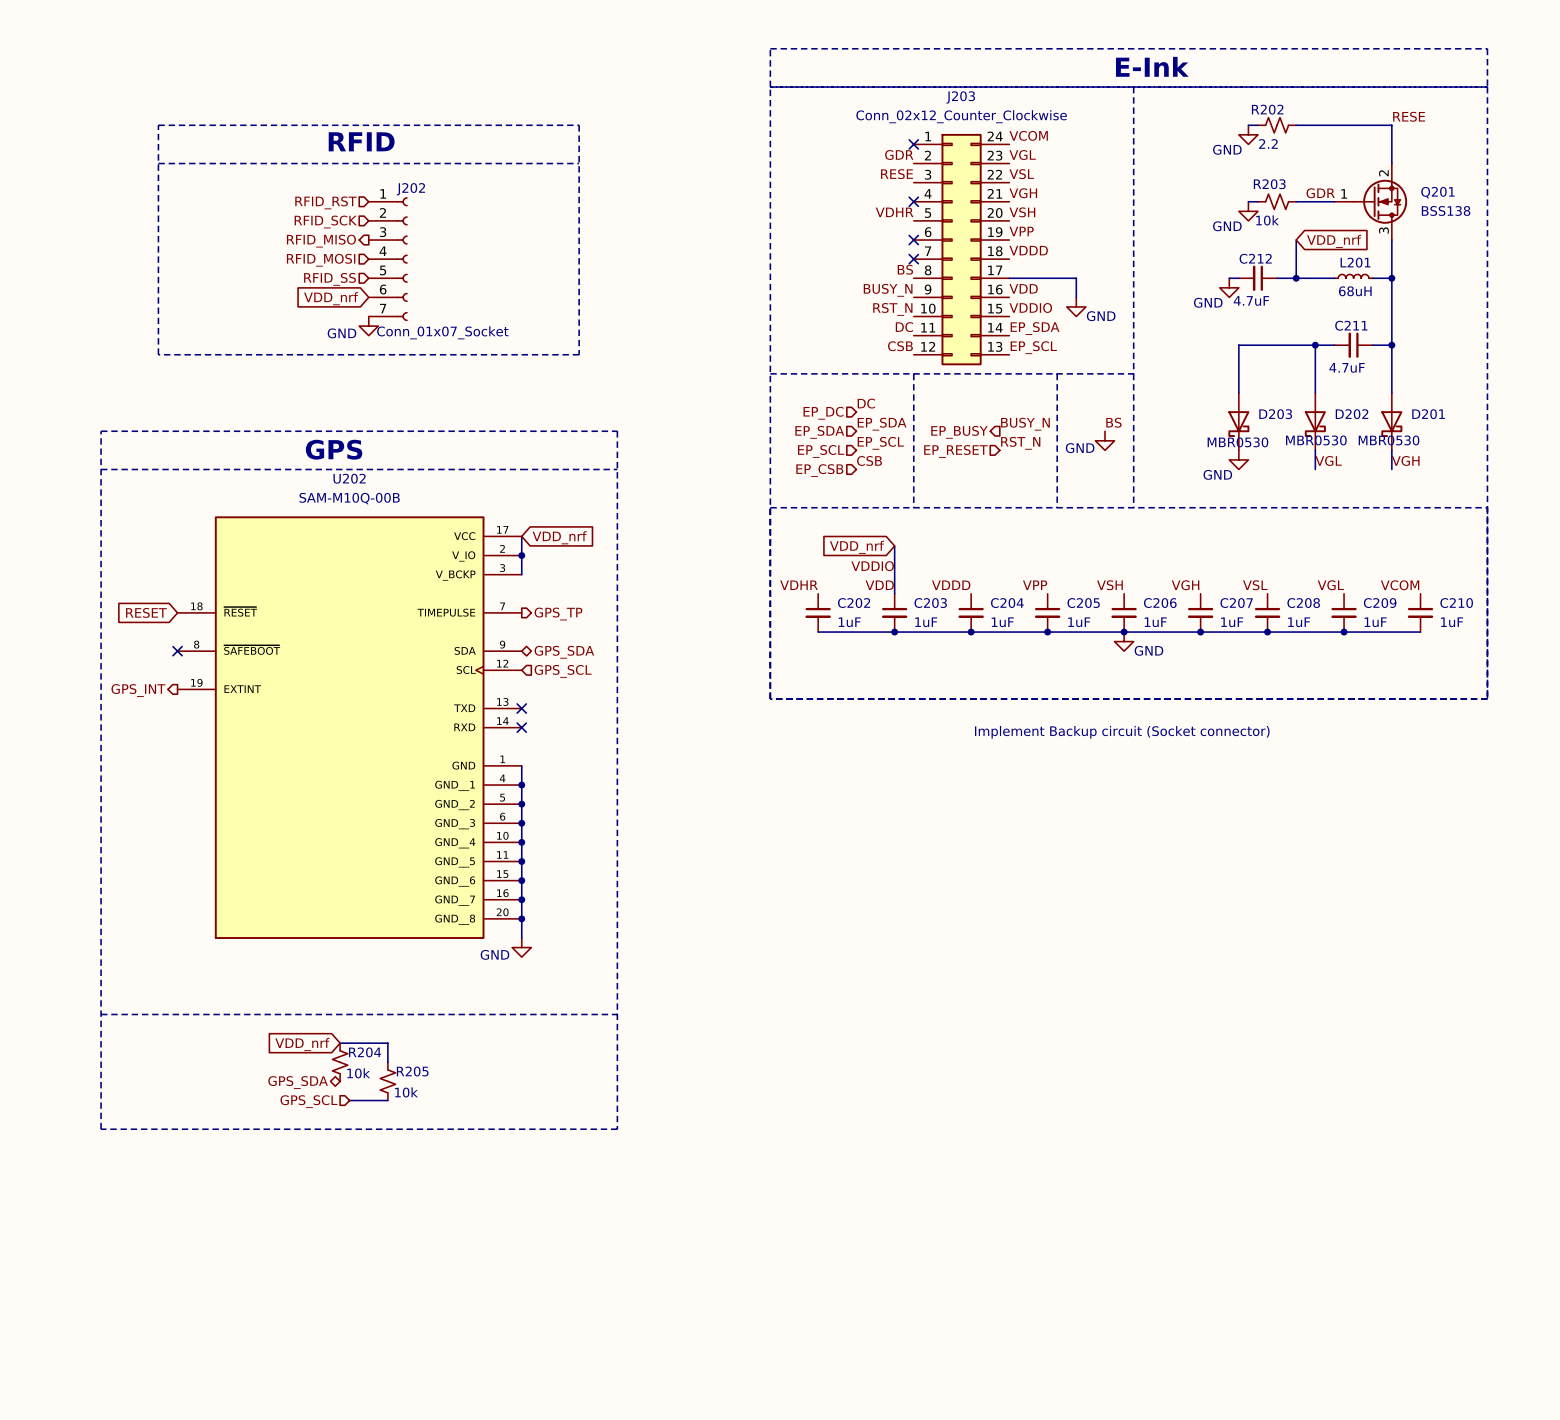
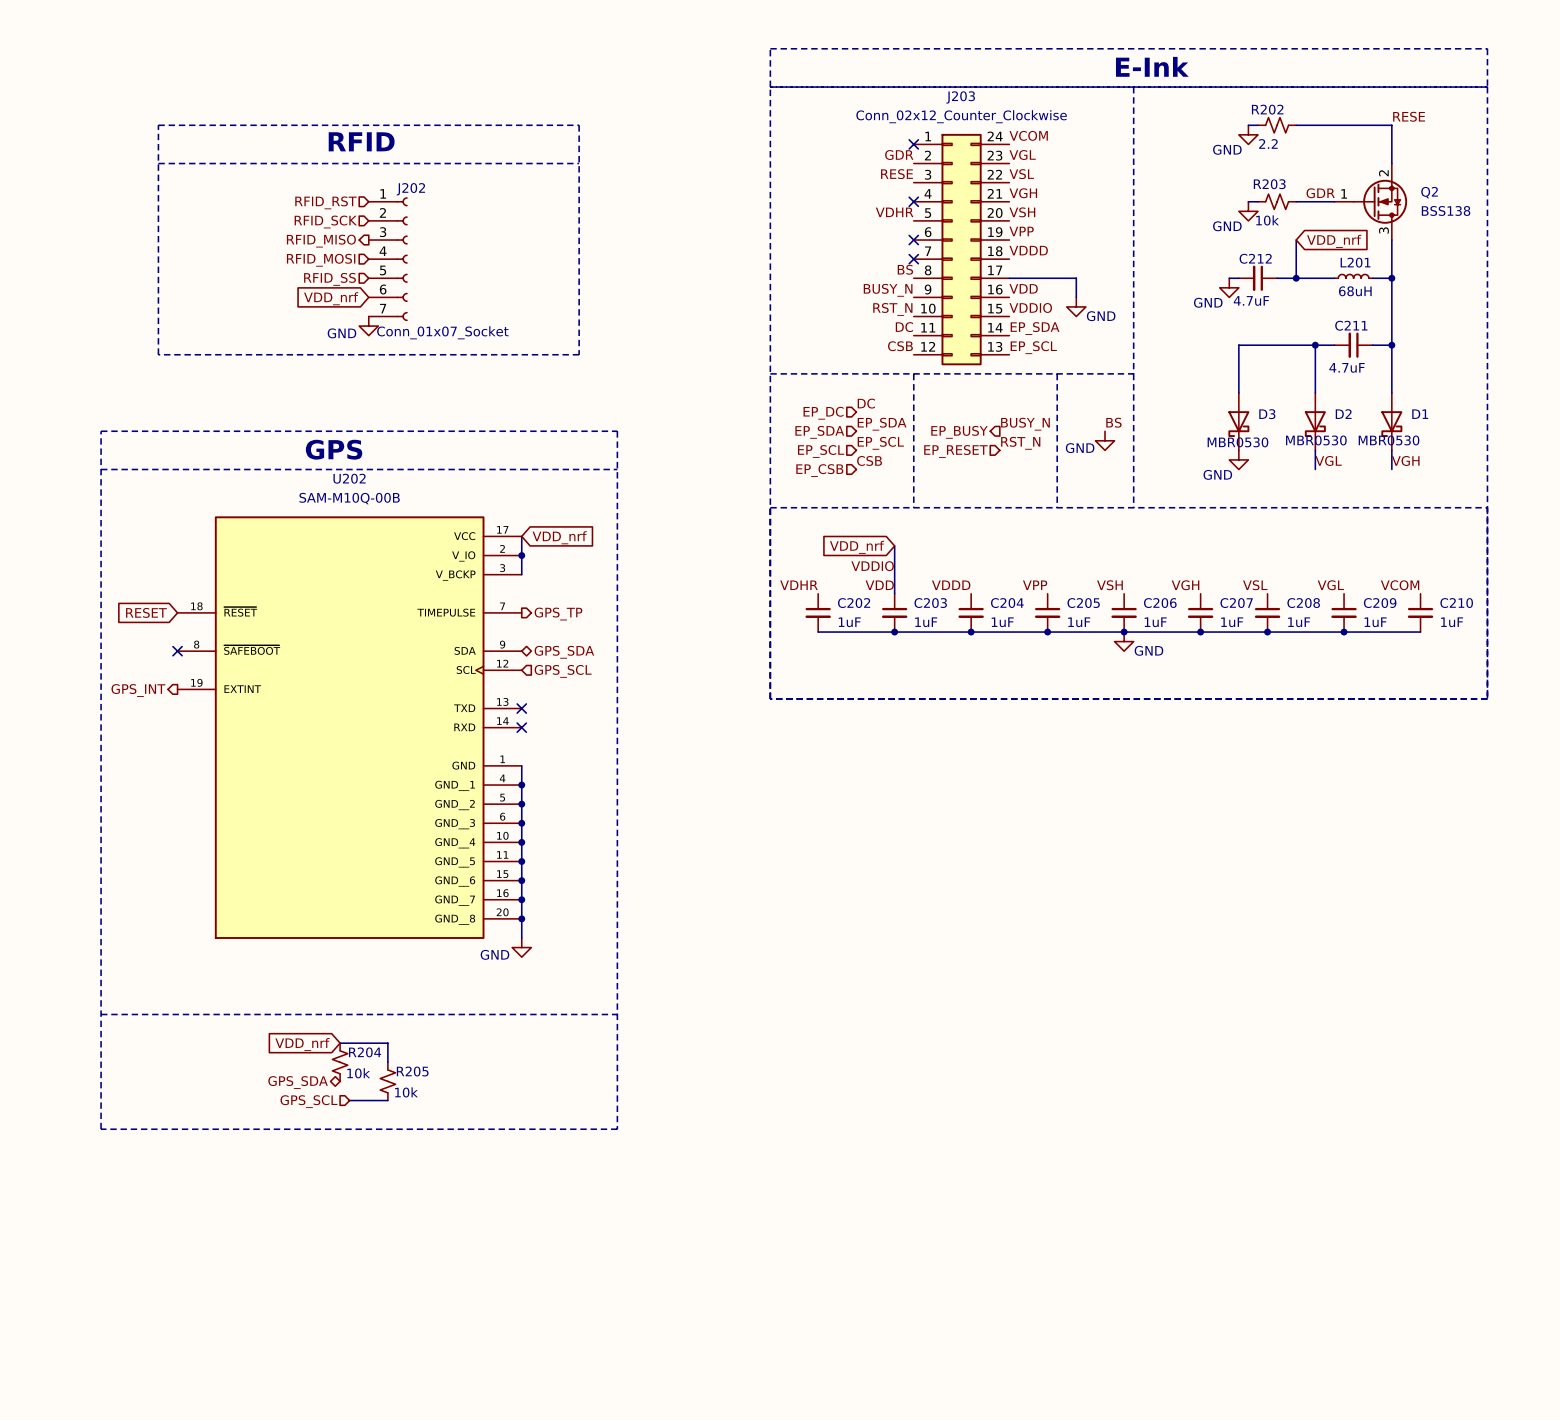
Q201 name: Q201 (1437, 192) -> Q2 (1429, 192)
D203 name: D203 (1275, 414) -> D3 (1267, 414)
D202 name: D202 (1352, 414) -> D2 (1343, 414)
D201 name: D201 (1428, 414) -> D1 (1420, 414)
text: Implement Backup circuit (Socket connector) (1122, 732) -> none

